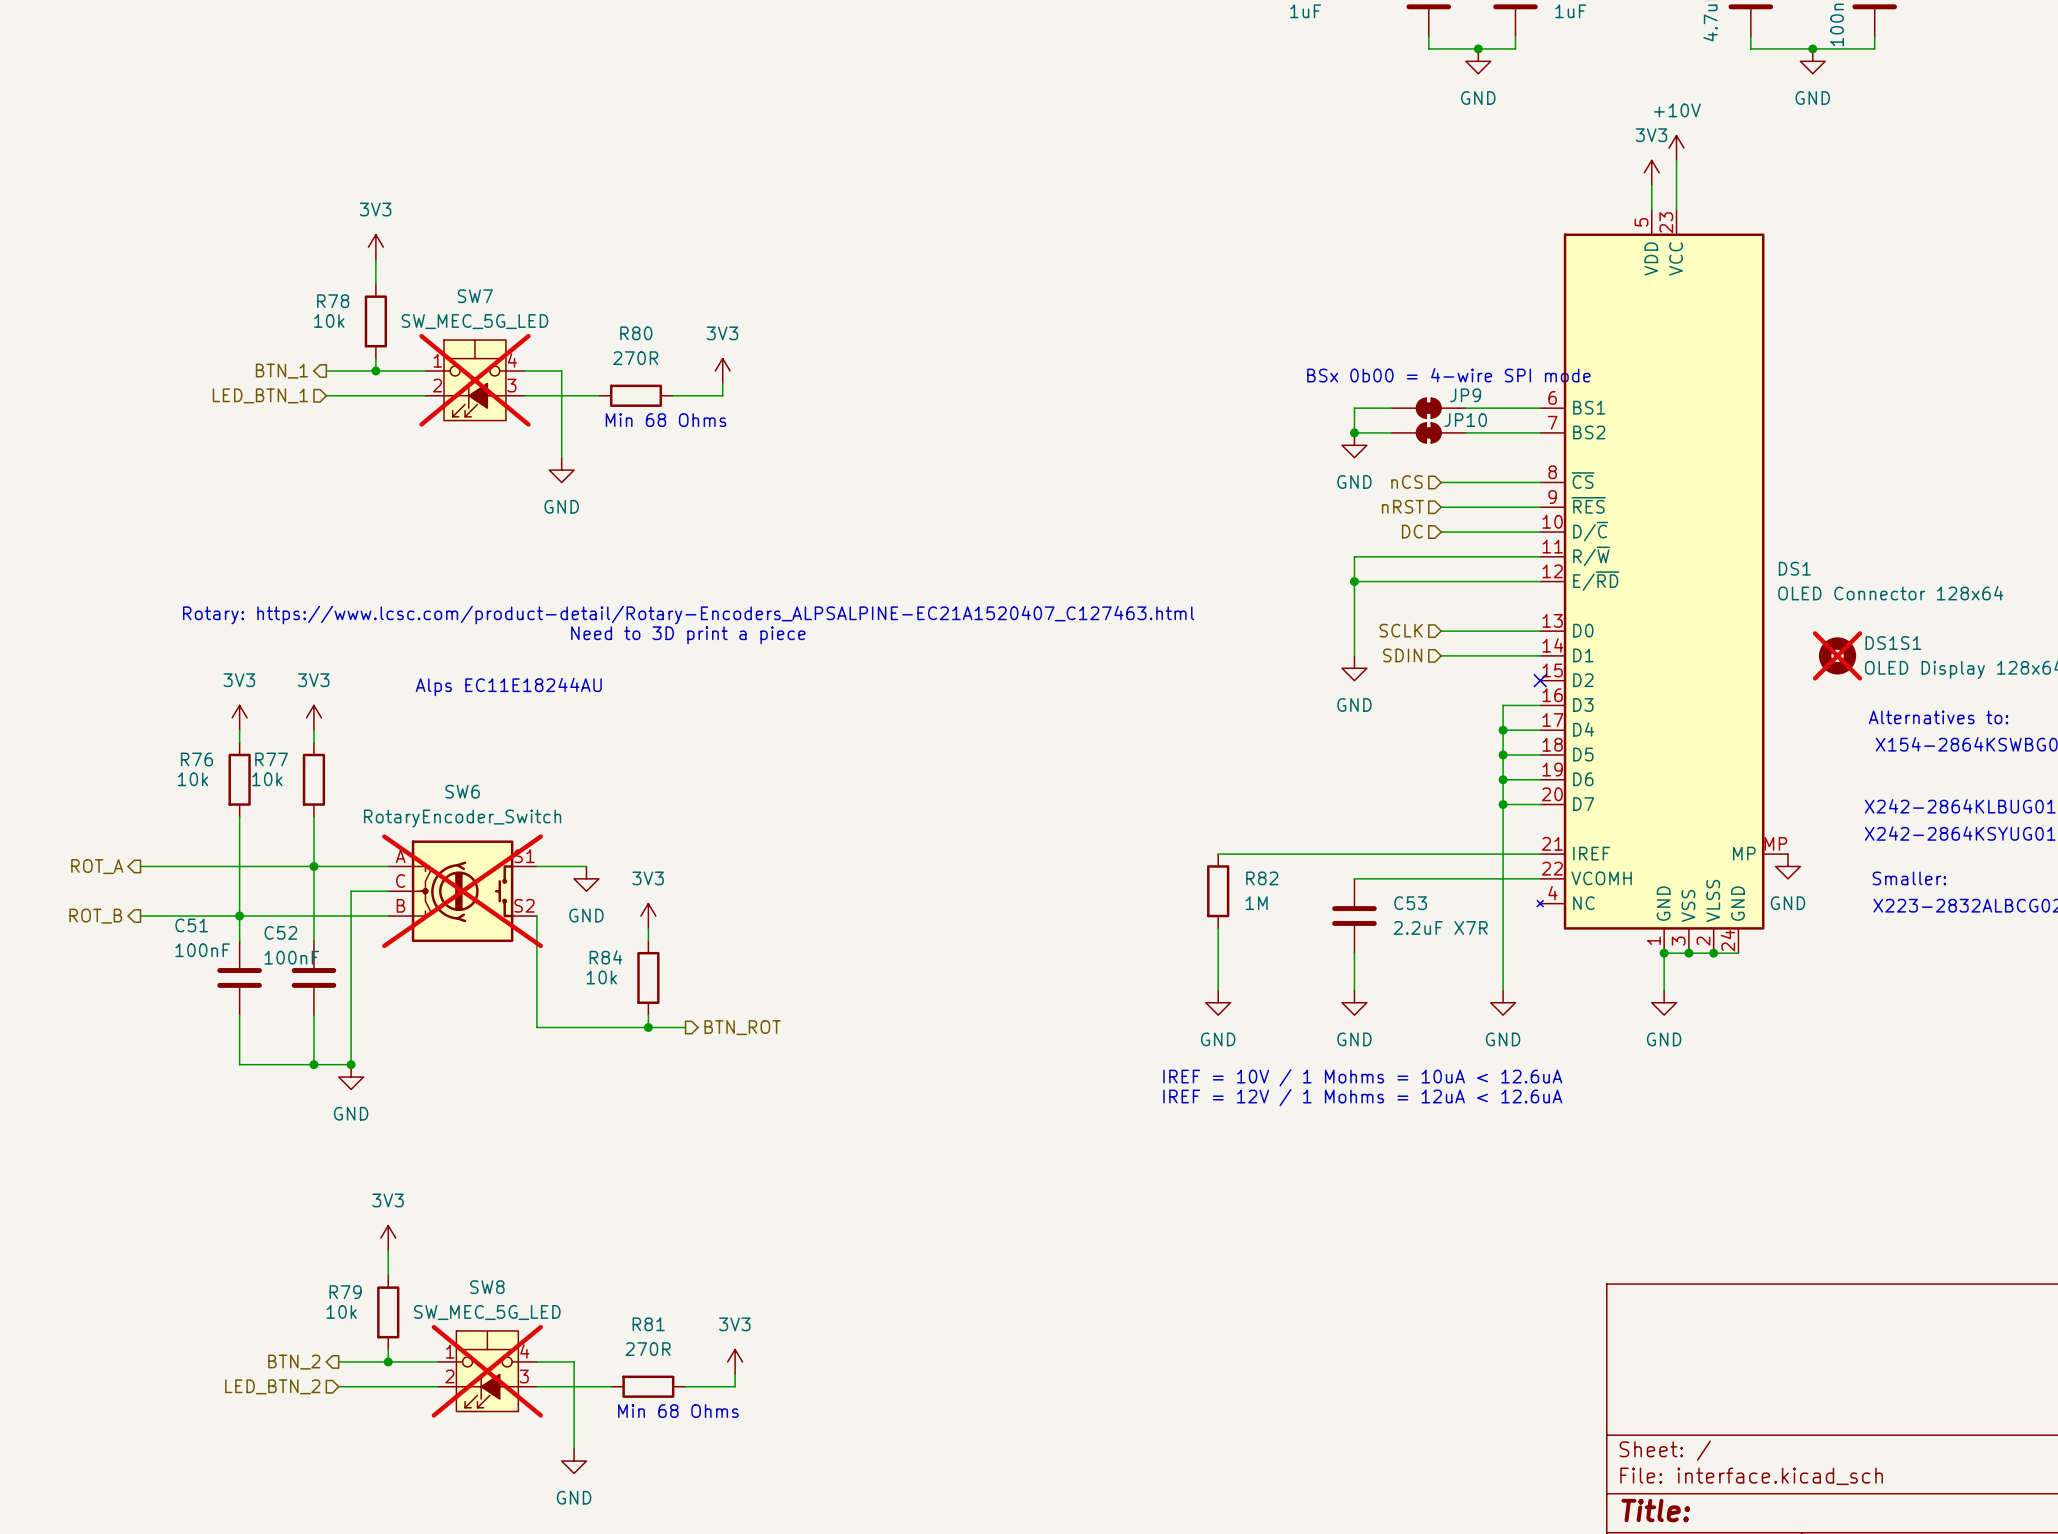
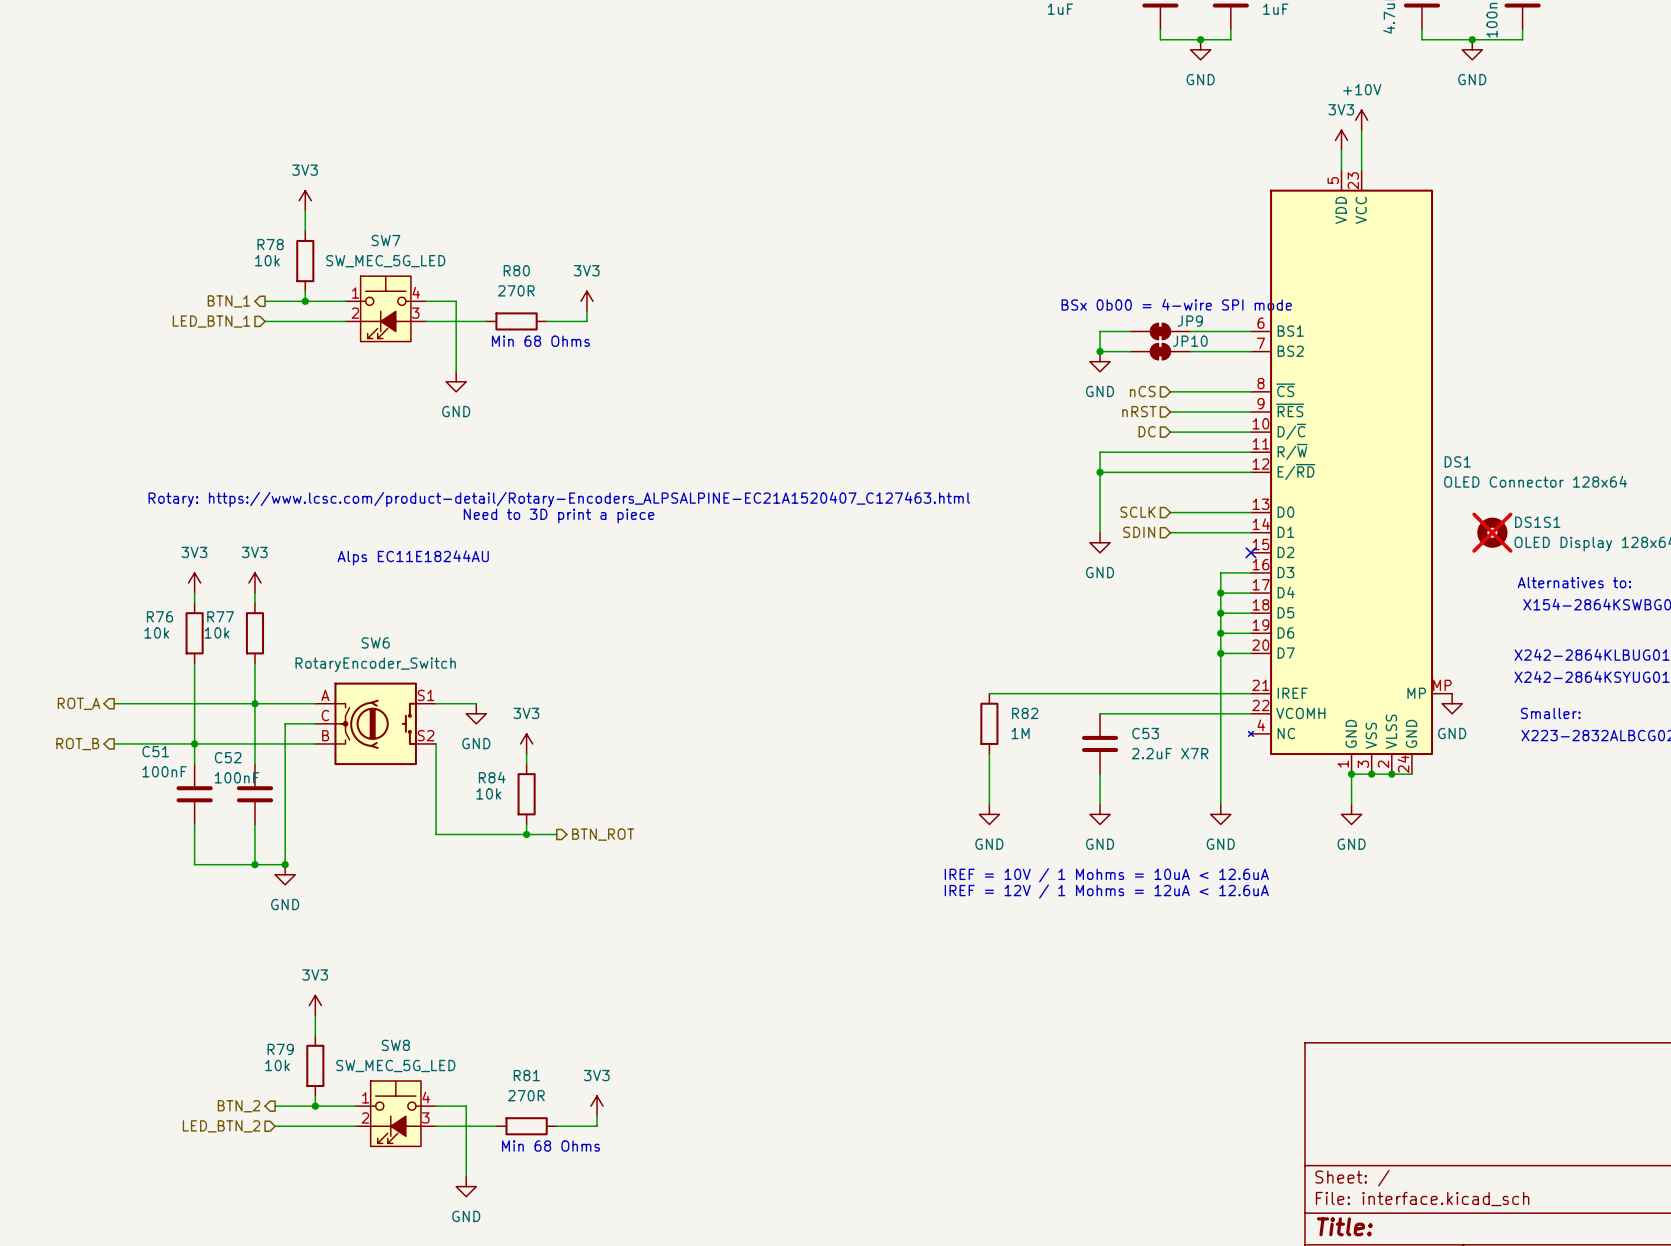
SW7 do-not-place cross: (474, 380) -> none
SW6 do-not-place cross: (462, 891) -> none
SW8 do-not-place cross: (487, 1371) -> none

